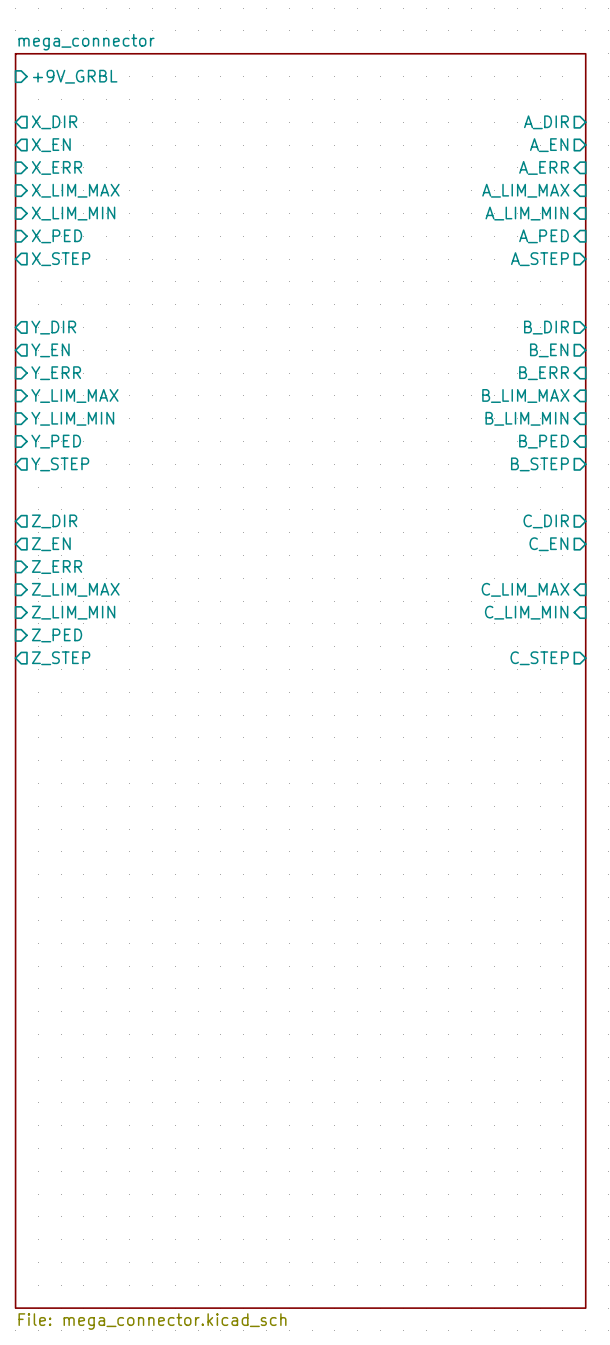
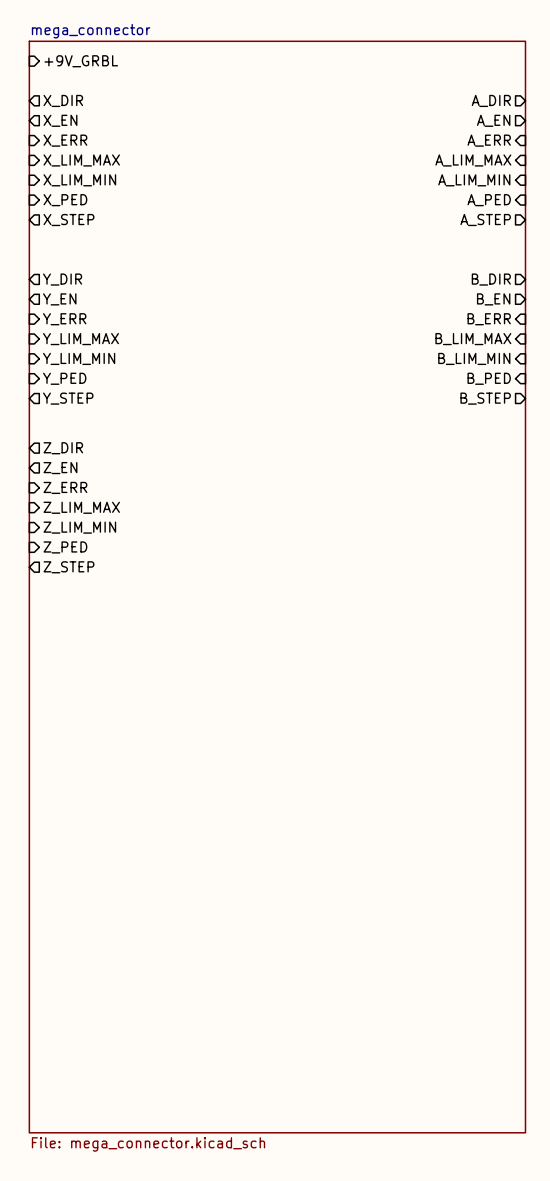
sheet pin: C_DIR (546, 521) -> none
sheet pin: C_EN (548, 544) -> none
sheet pin: C_LIM_MAX (525, 589) -> none
sheet pin: C_LIM_MIN (526, 612) -> none
sheet pin: C_STEP (539, 658) -> none

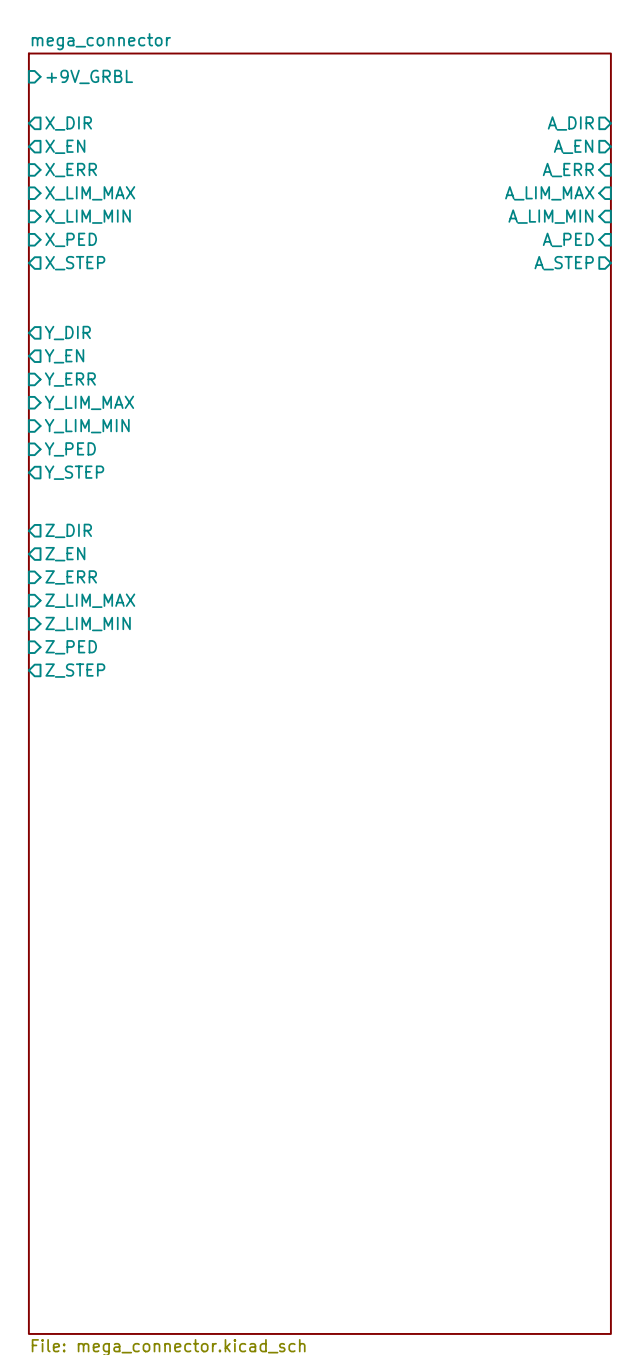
sheet pin: B_DIR (491, 279) -> none
sheet pin: B_EN (493, 299) -> none
sheet pin: B_ERR (489, 319) -> none
sheet pin: B_LIM_MAX (473, 339) -> none
sheet pin: B_LIM_MIN (474, 358) -> none
sheet pin: B_PED (489, 378) -> none
sheet pin: B_STEP (485, 398) -> none

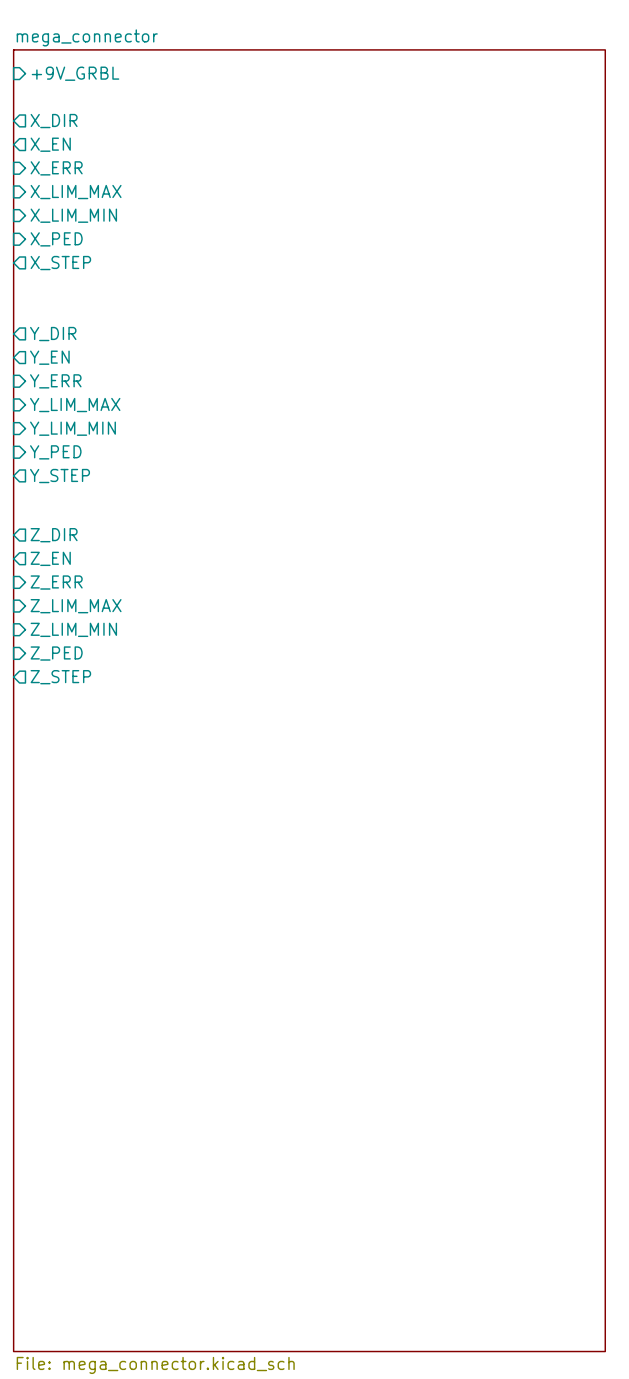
sheet pin: A_DIR (570, 123) -> none
sheet pin: A_EN (573, 146) -> none
sheet pin: A_ERR (568, 170) -> none
sheet pin: A_LIM_MAX (549, 193) -> none
sheet pin: A_LIM_MIN (550, 216) -> none
sheet pin: A_PED (568, 239) -> none
sheet pin: A_STEP (564, 263) -> none

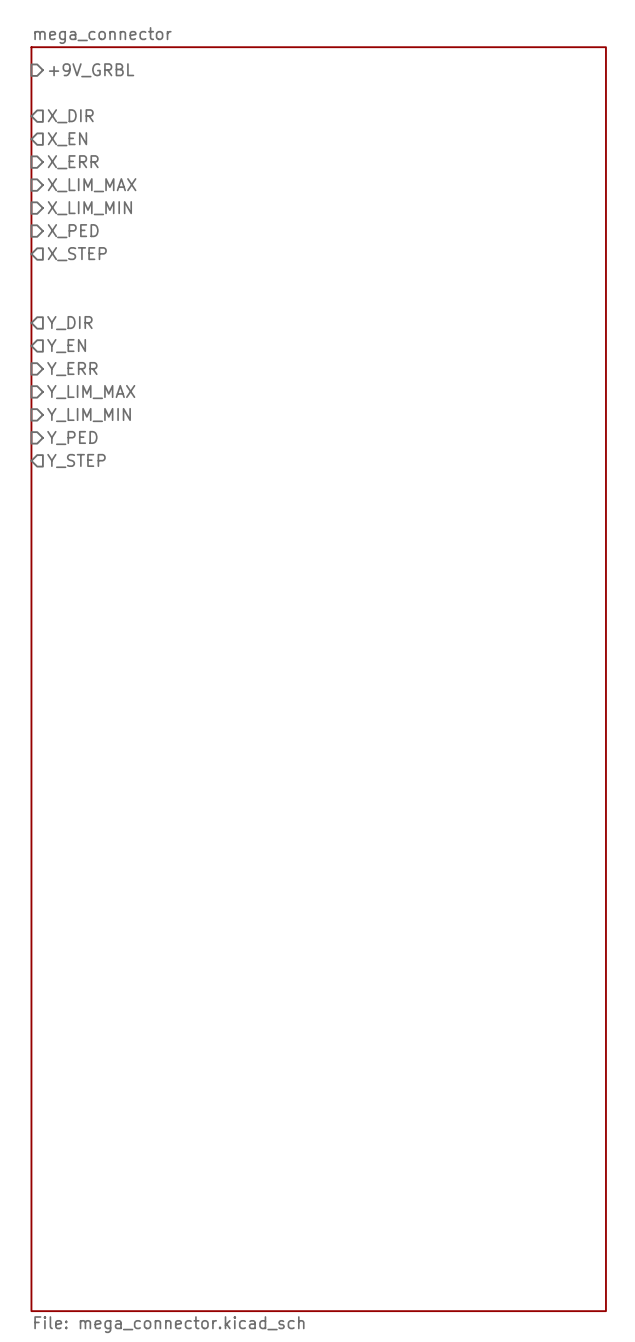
sheet pin: Z_DIR (54, 535) -> none
sheet pin: Z_EN (50, 558) -> none
sheet pin: Z_ERR (56, 582) -> none
sheet pin: Z_LIM_MAX (76, 606) -> none
sheet pin: Z_LIM_MIN (73, 629) -> none
sheet pin: Z_PED (56, 653) -> none
sheet pin: Z_STEP (60, 677) -> none

